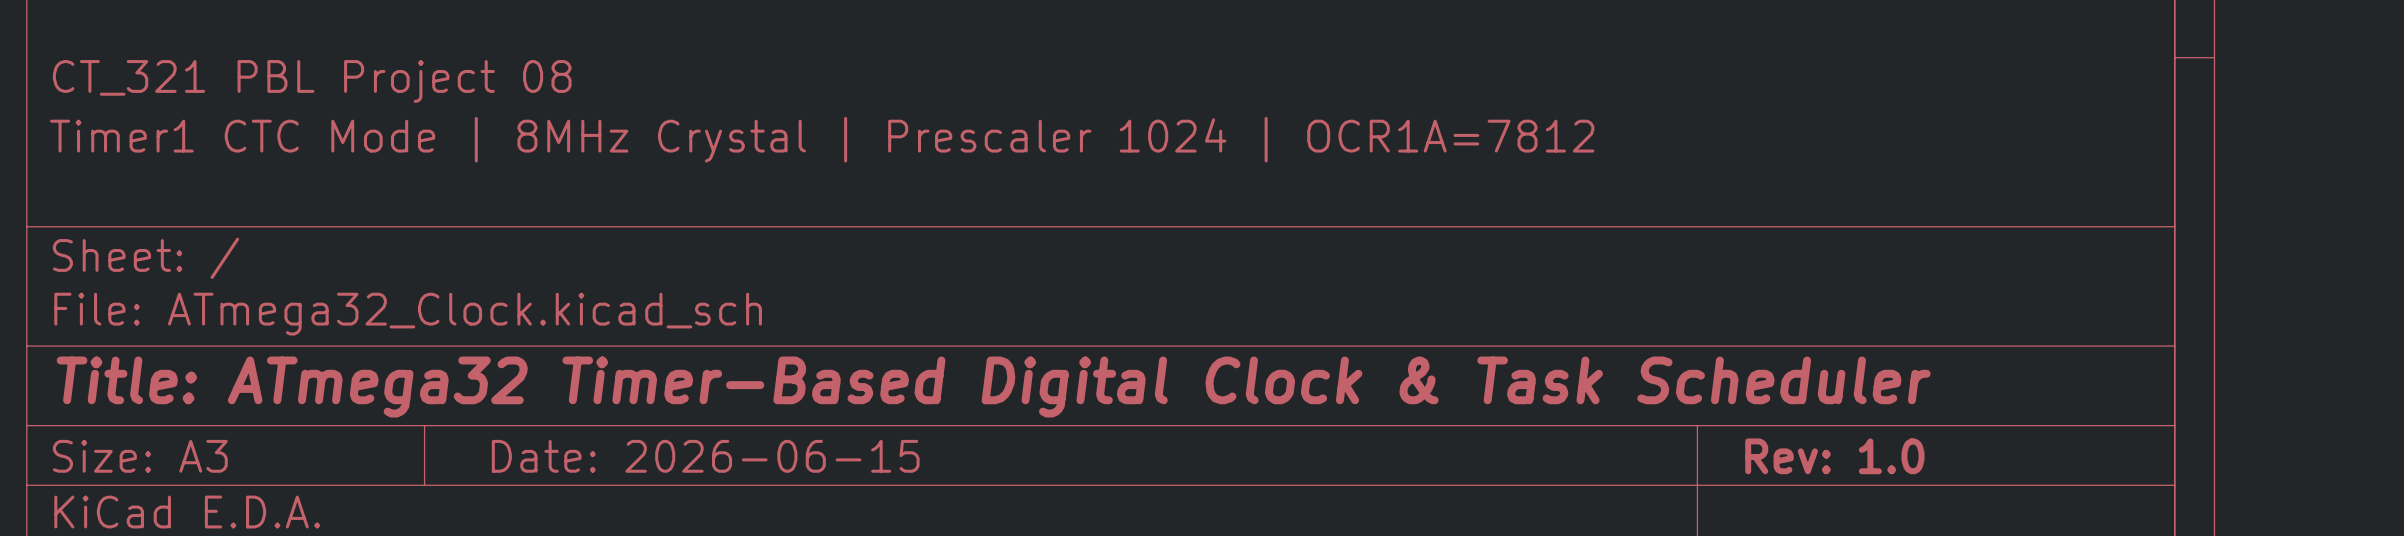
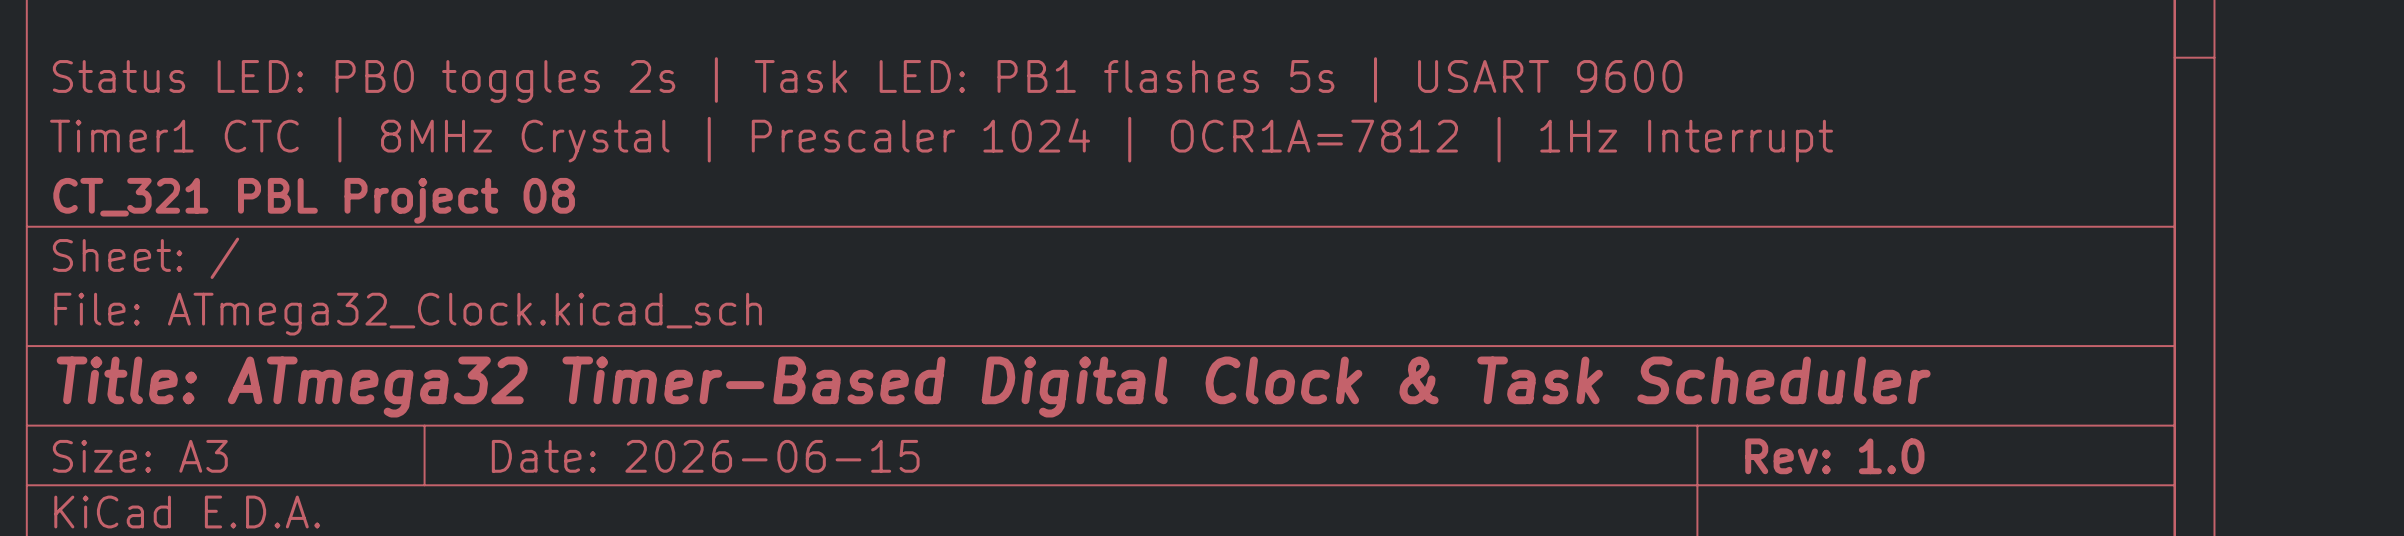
title block: CT_321 PBL Project 08 (312, 81) -> Status LED: PB0 toggles 2s | Task LED: PB1 flashes 5s | USART 9600 (867, 80)
title block: Timer1 CTC Mode | 8MHz Crystal | Prescaler 1024 | OCR1A=7812 (822, 139) -> Timer1 CTC | 8MHz Crystal | Prescaler 1024 | OCR1A=7812 | 1Hz Interrupt (941, 139)
title block: none -> CT_321 PBL Project 08 (314, 200)

